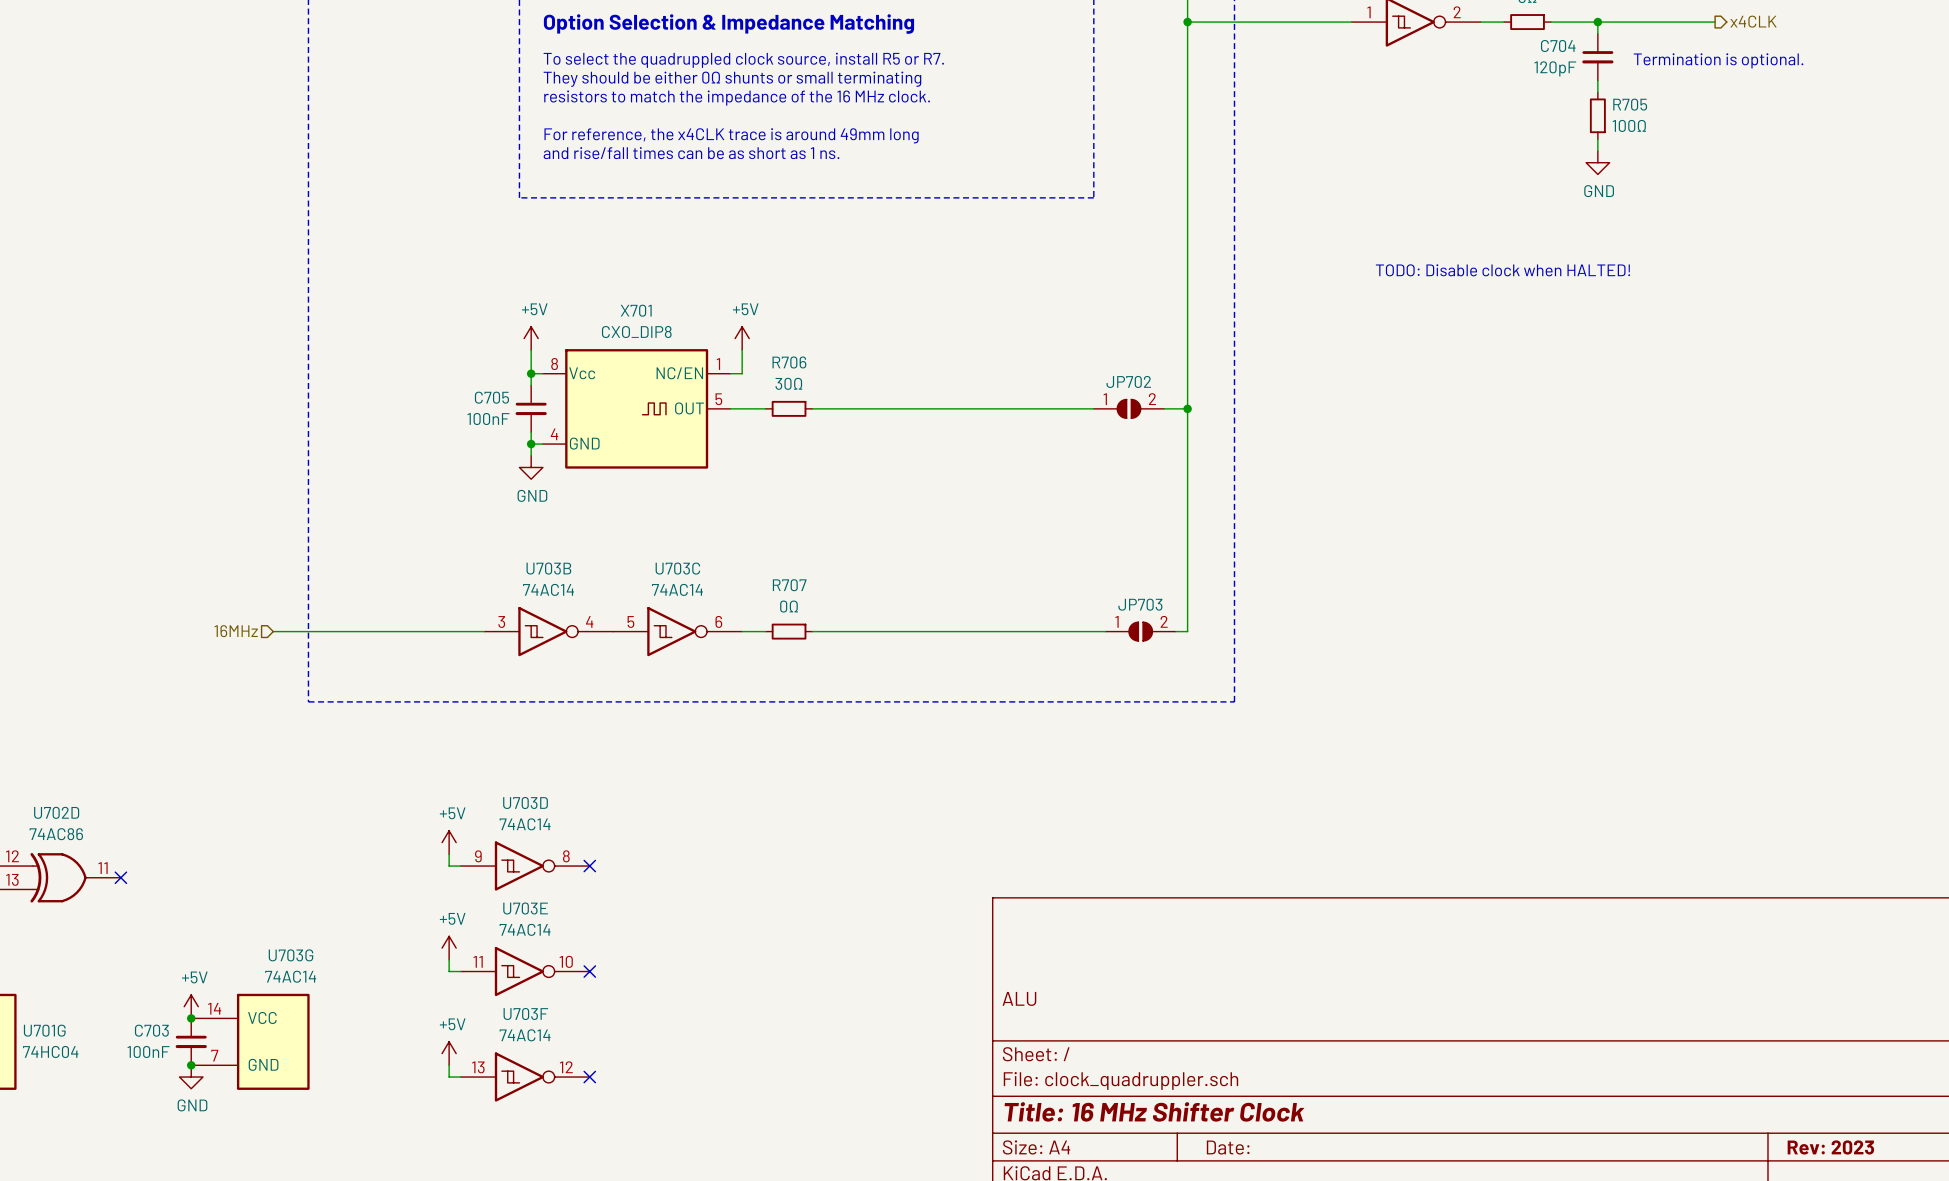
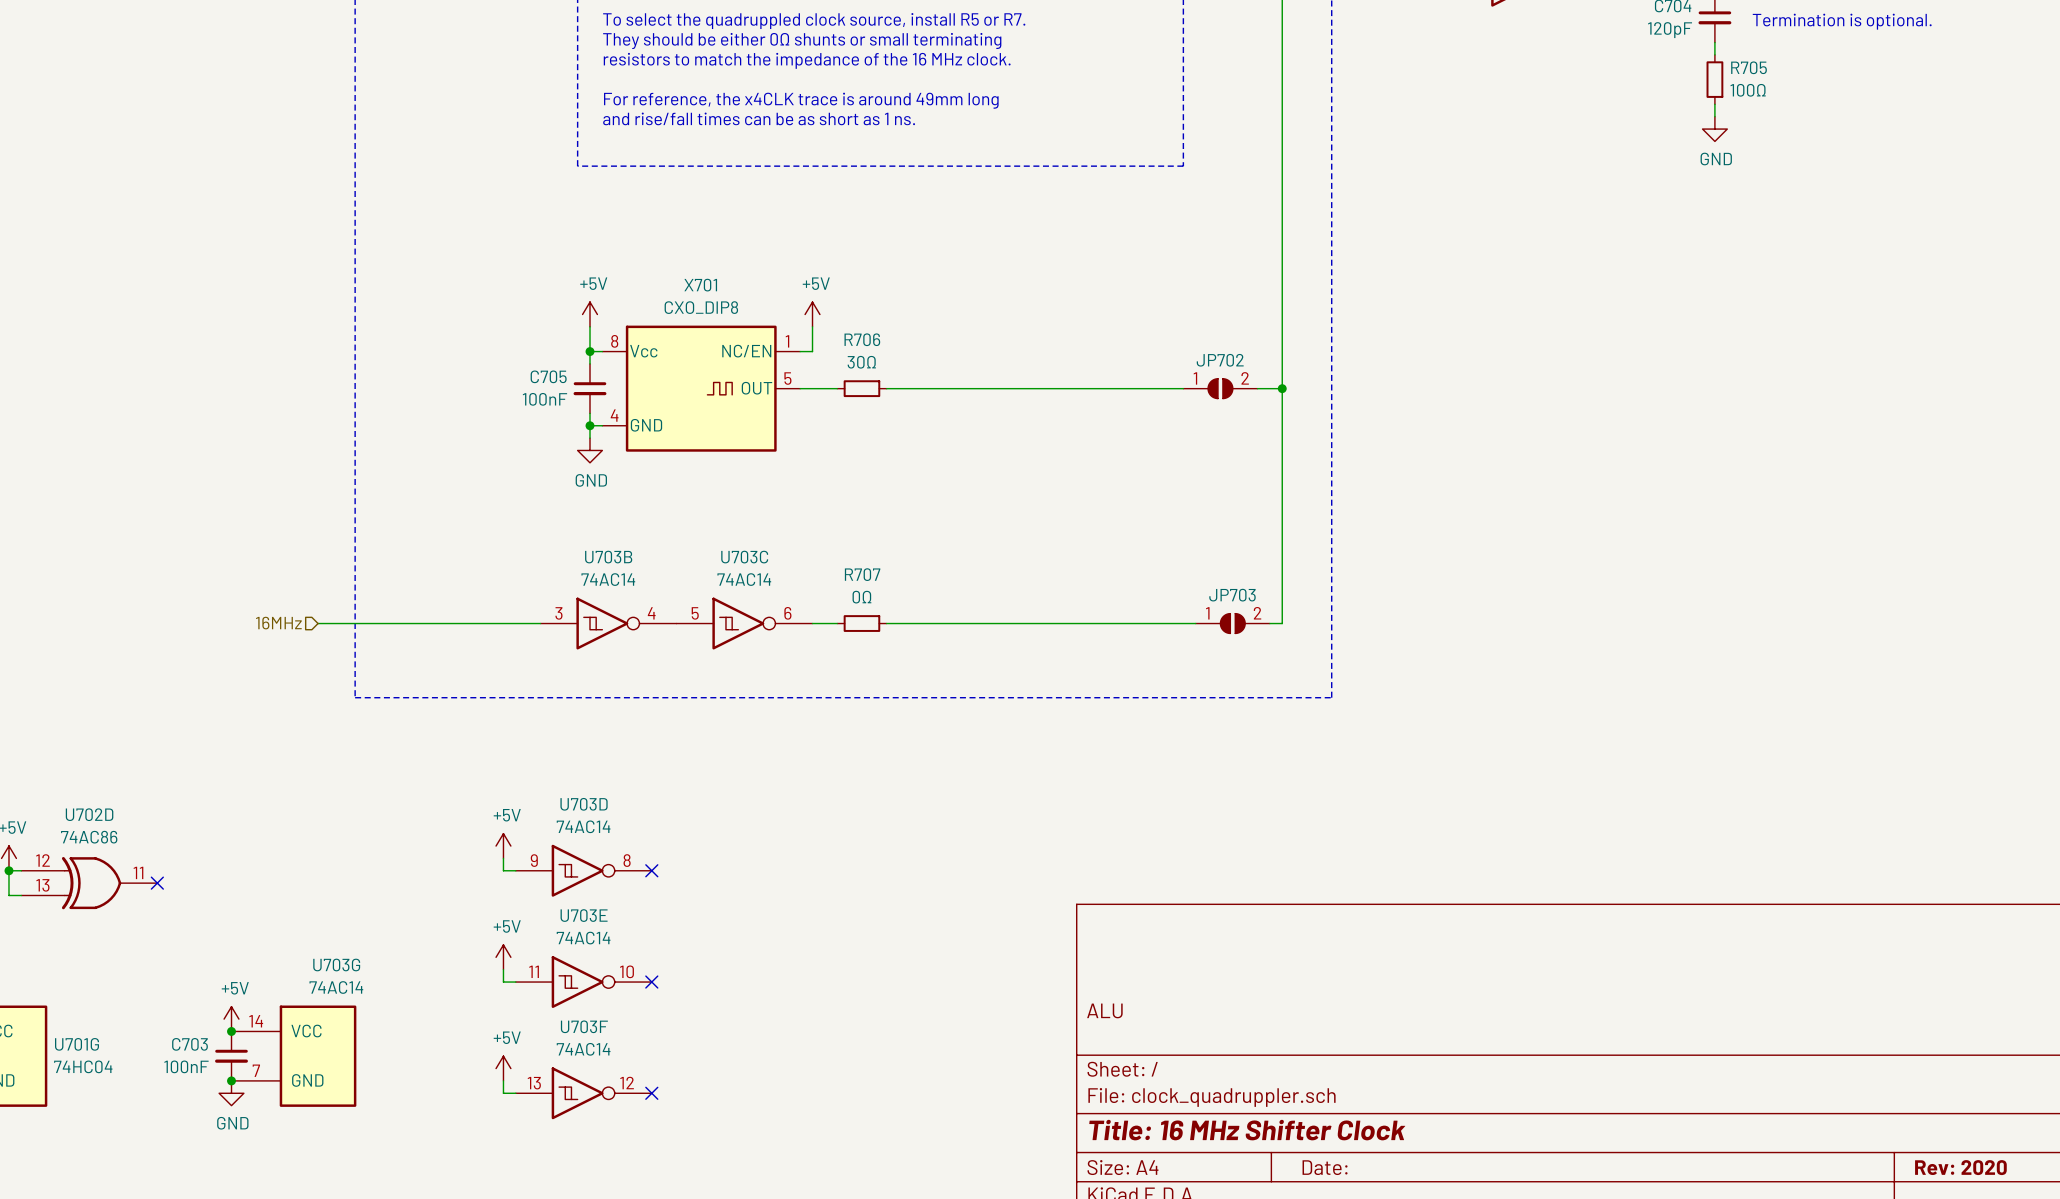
text: TODO: Disable clock when HALTED! (1502, 270) -> none
title block: Rev: 2023 (1830, 1147) -> Rev: 2020 (1960, 1167)

